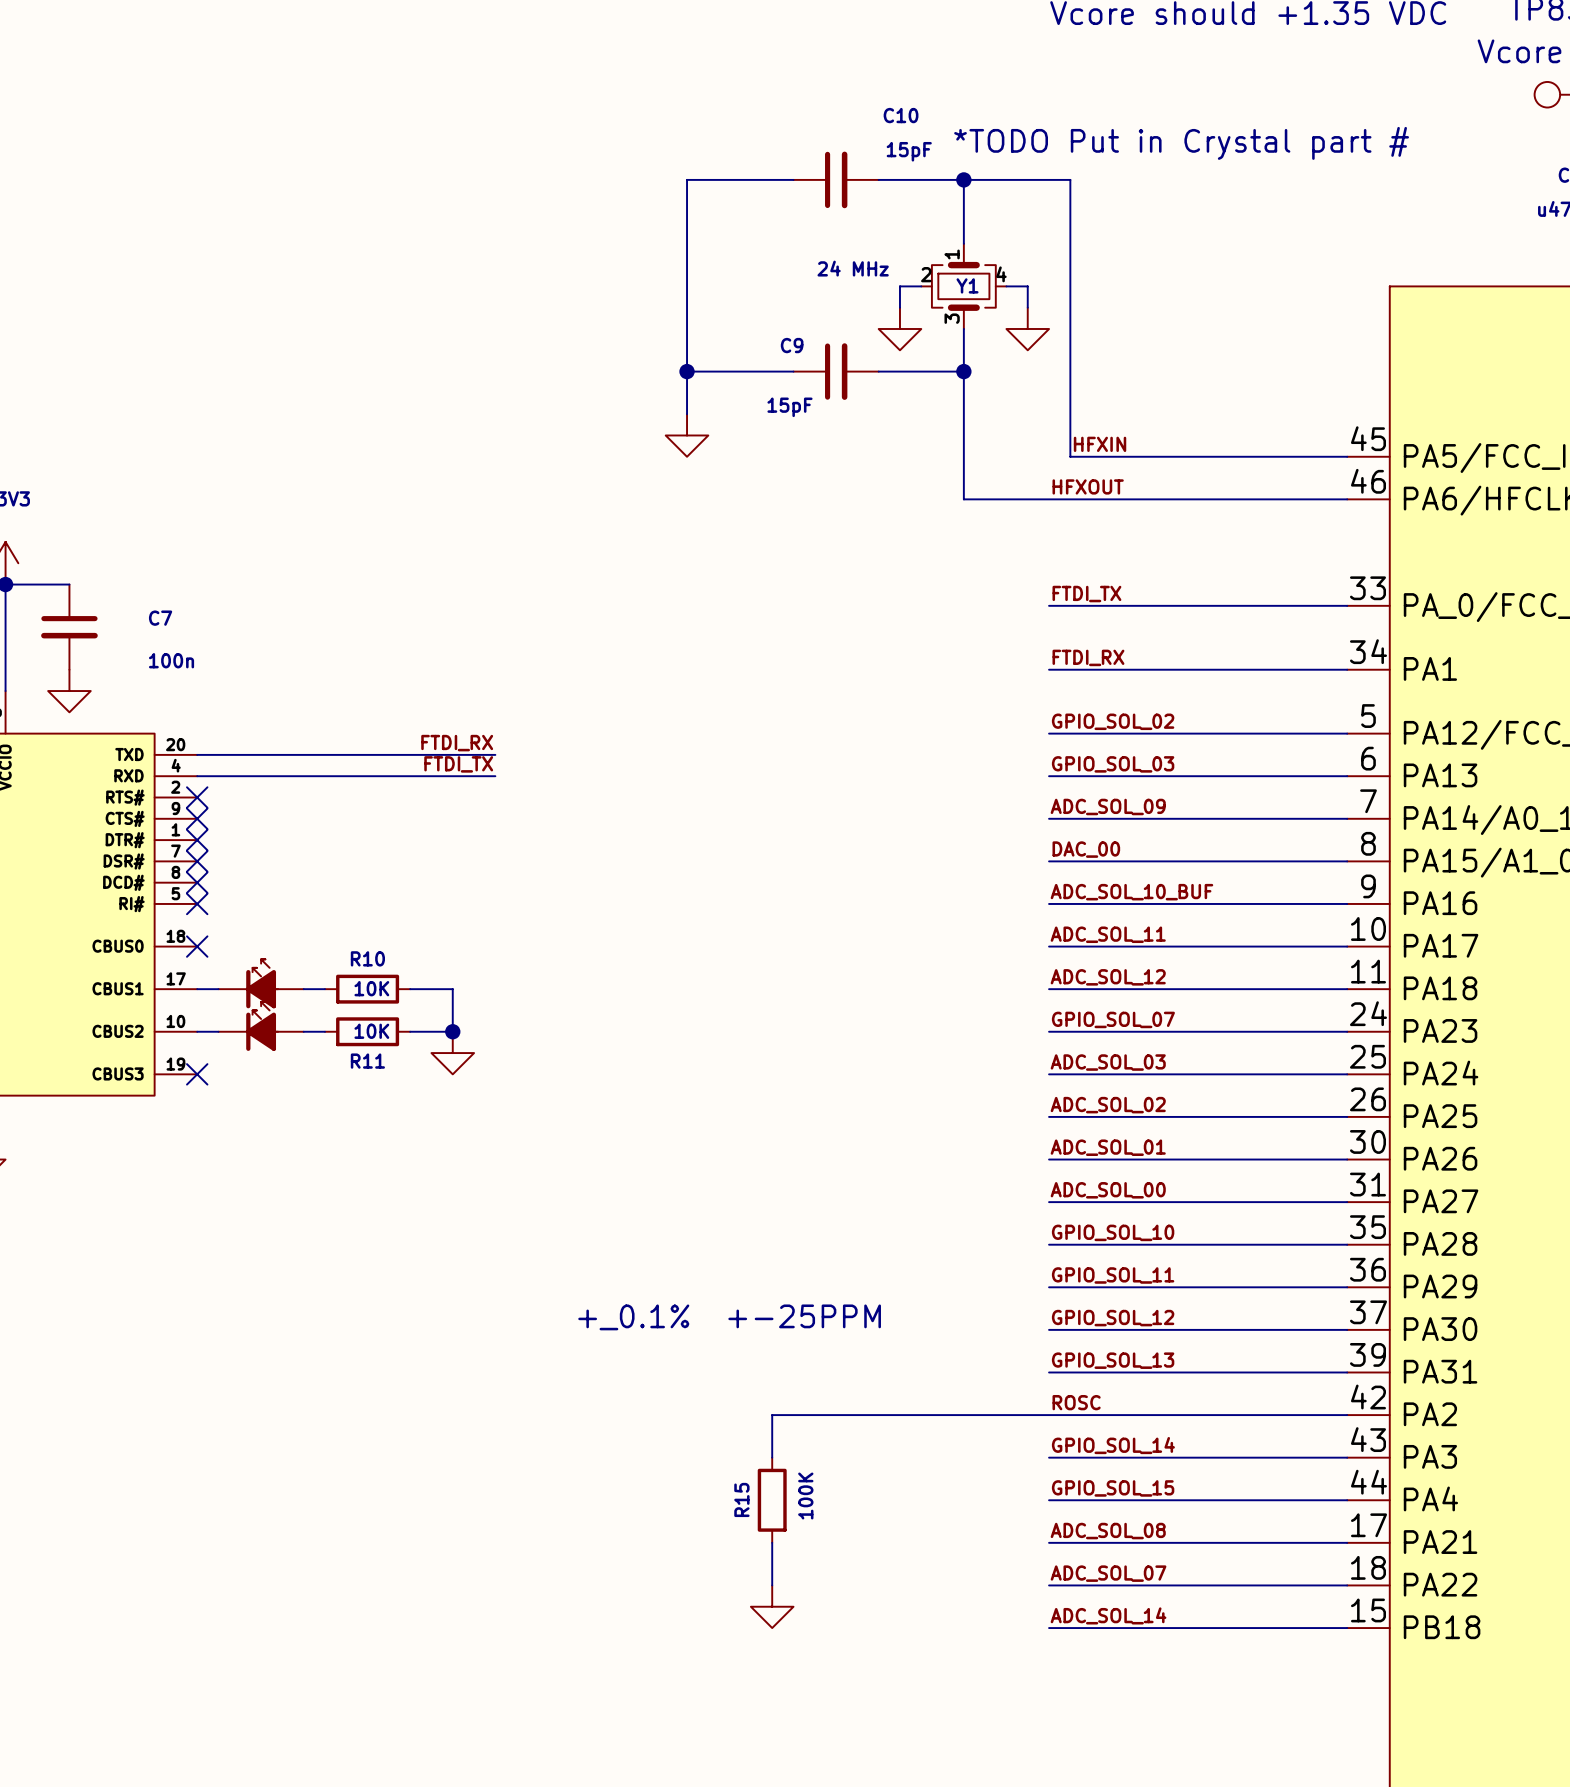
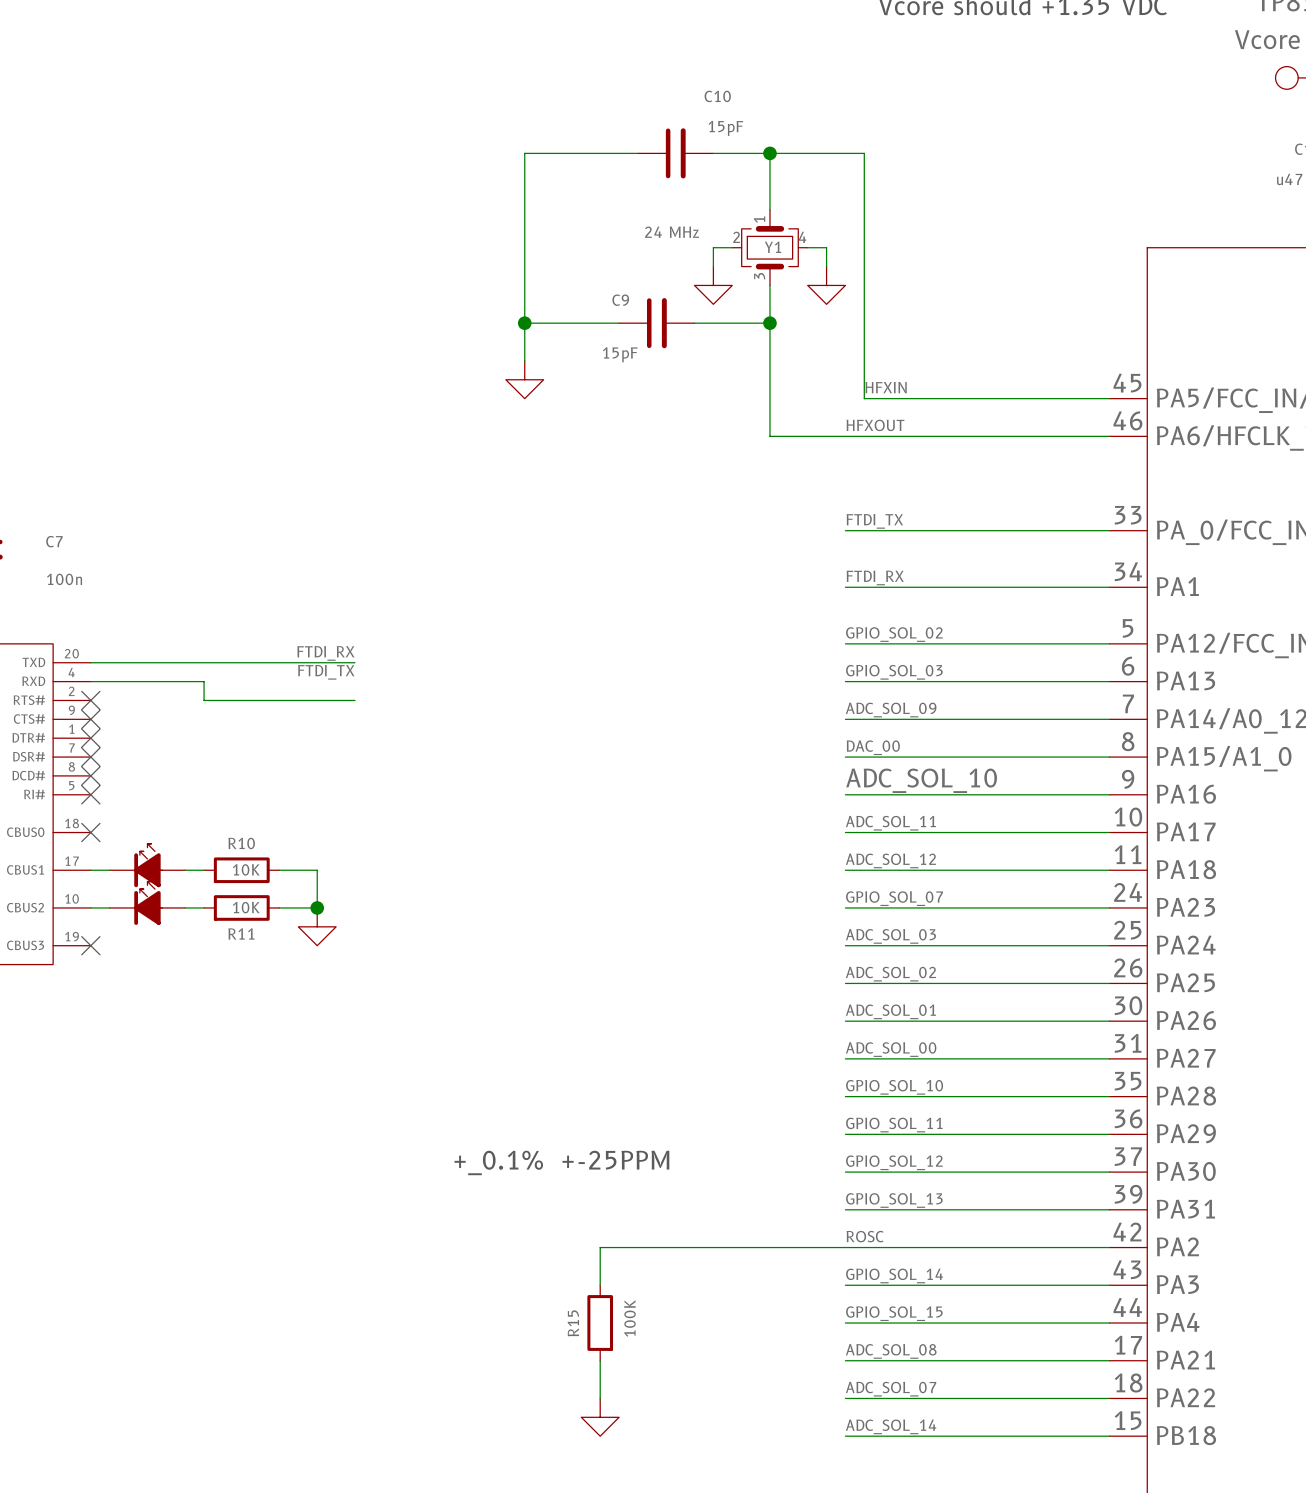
text: *TODO Put in Crystal part # (1181, 143) -> none
C10 position: (836, 179) -> (675, 153)
wire: (324, 776) (495, 776) -> (204, 681) (204, 700) (354, 700)
label: ADC_SOL_10_BUF (1131, 892) -> ADC_SOL_10 (921, 780)

